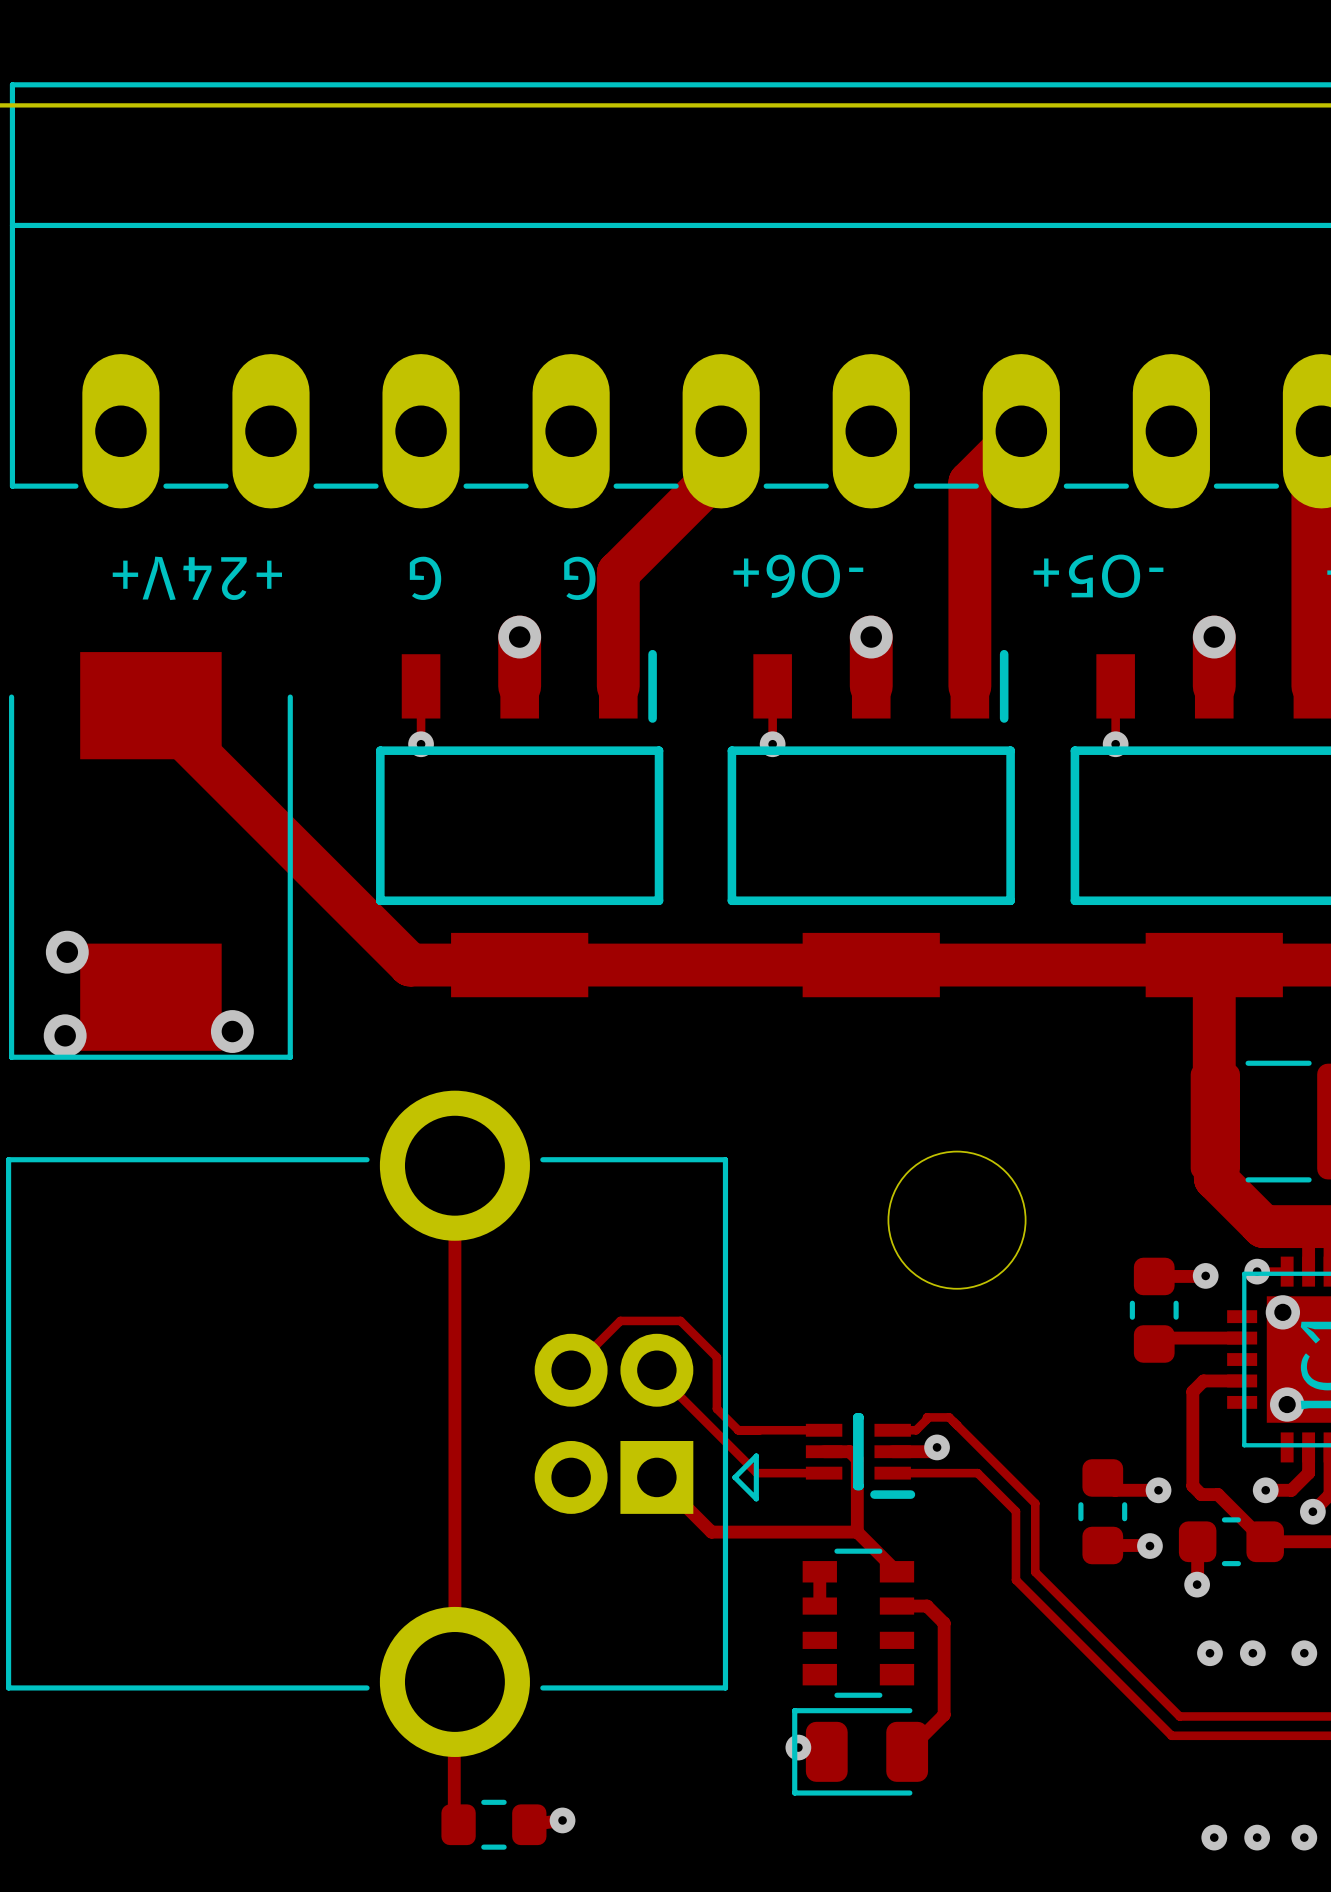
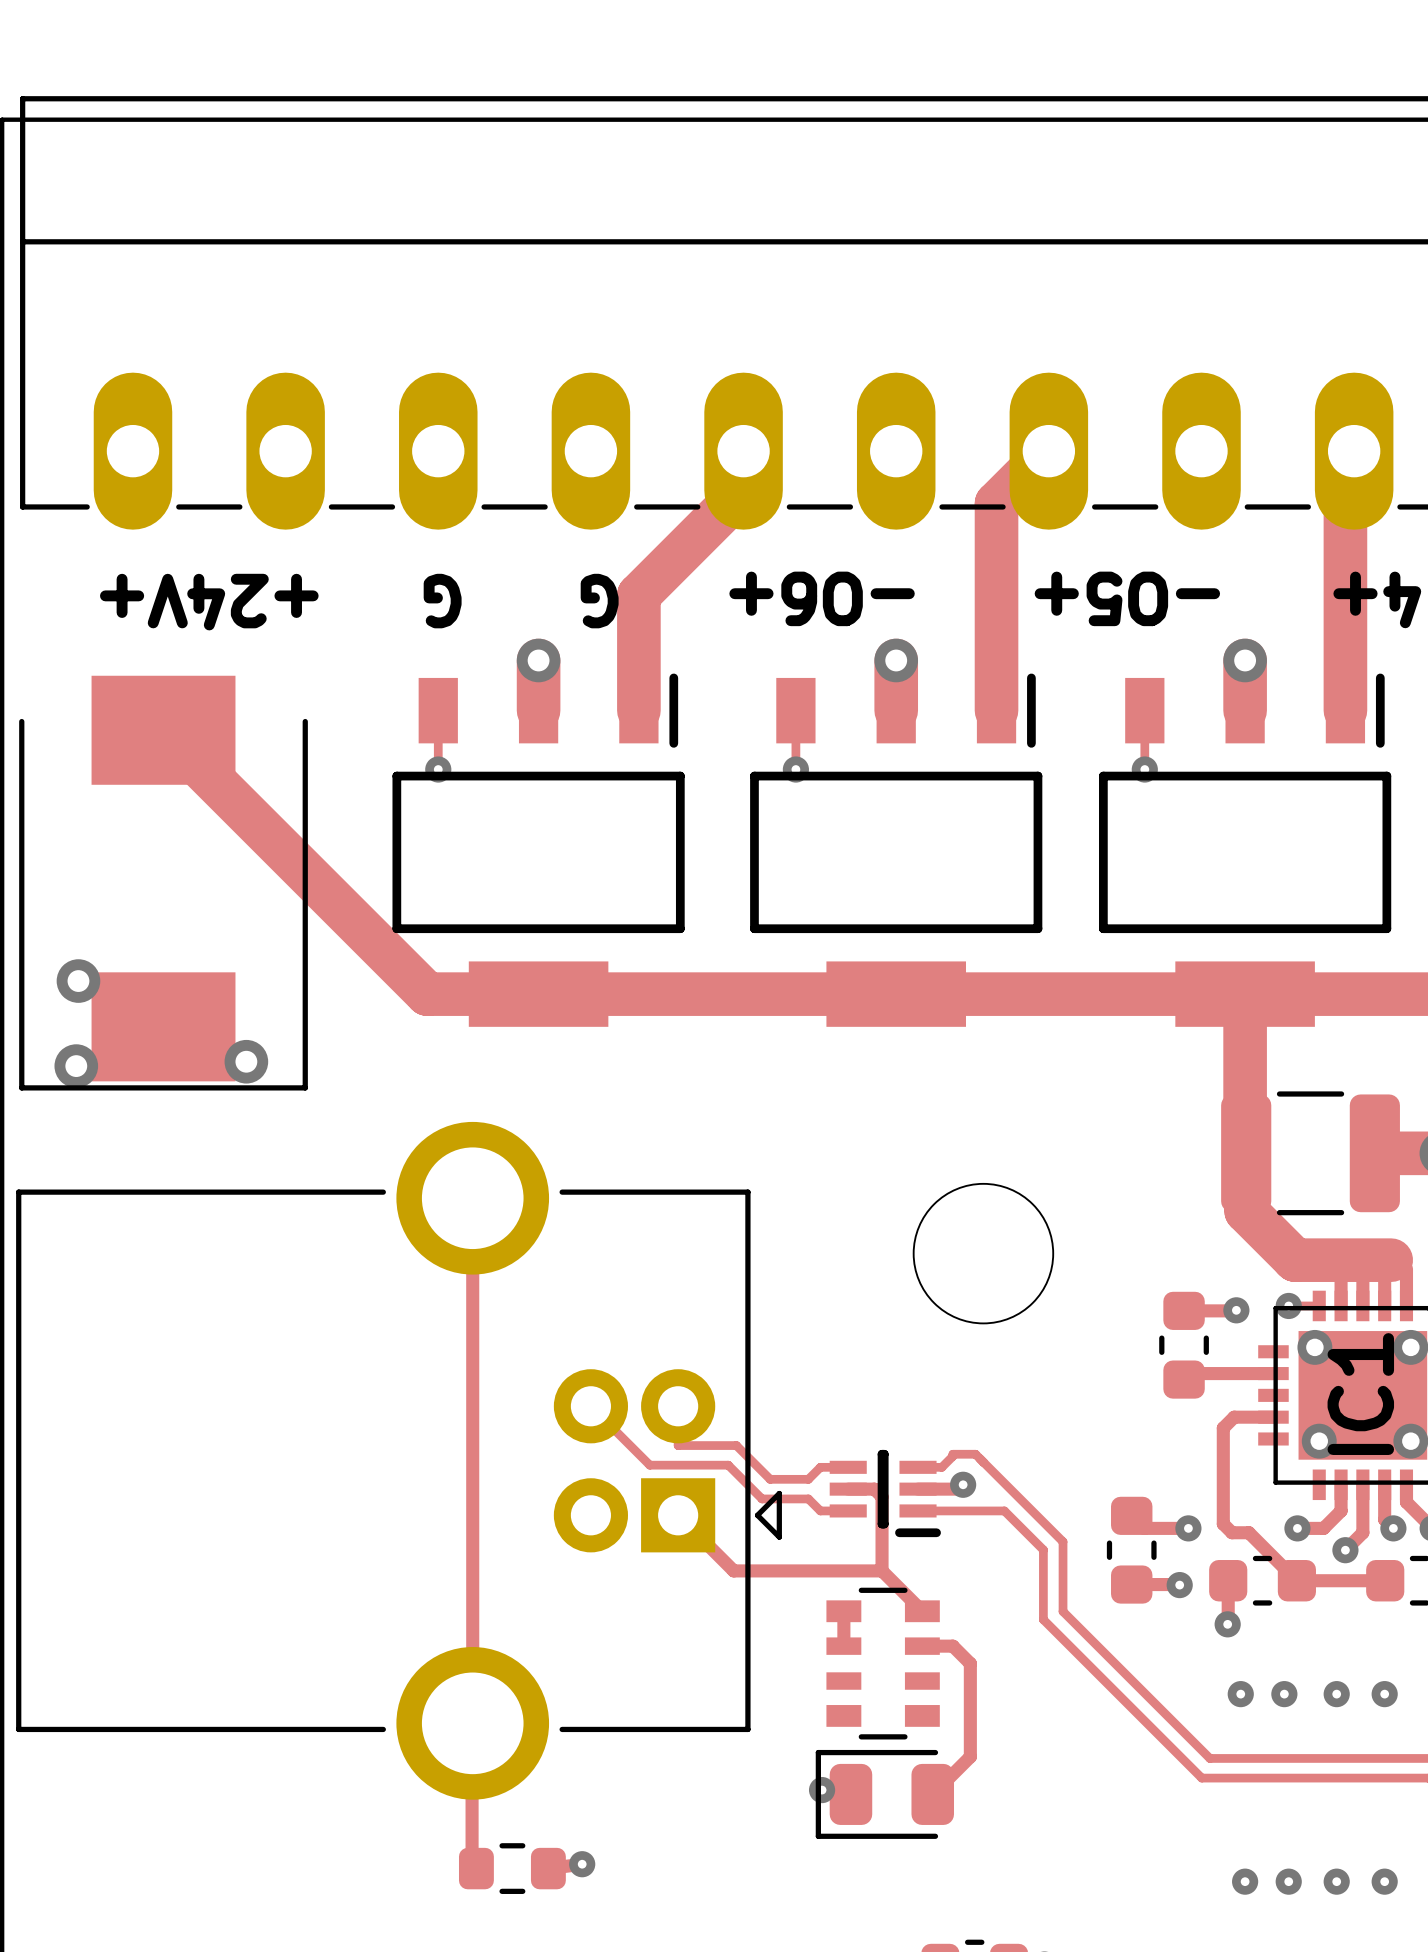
track: (571, 1370) (620, 1320) (680, 1320) (716, 1357) (716, 1408) (738, 1430) (796, 1430) -> (590, 1406) (649, 1465) (728, 1465) (762, 1498) (808, 1498) (820, 1510)
track: (656, 1373) (756, 1473) (796, 1473) -> (678, 1409) (678, 1445) (736, 1445) (770, 1479) (808, 1479) (820, 1467)

